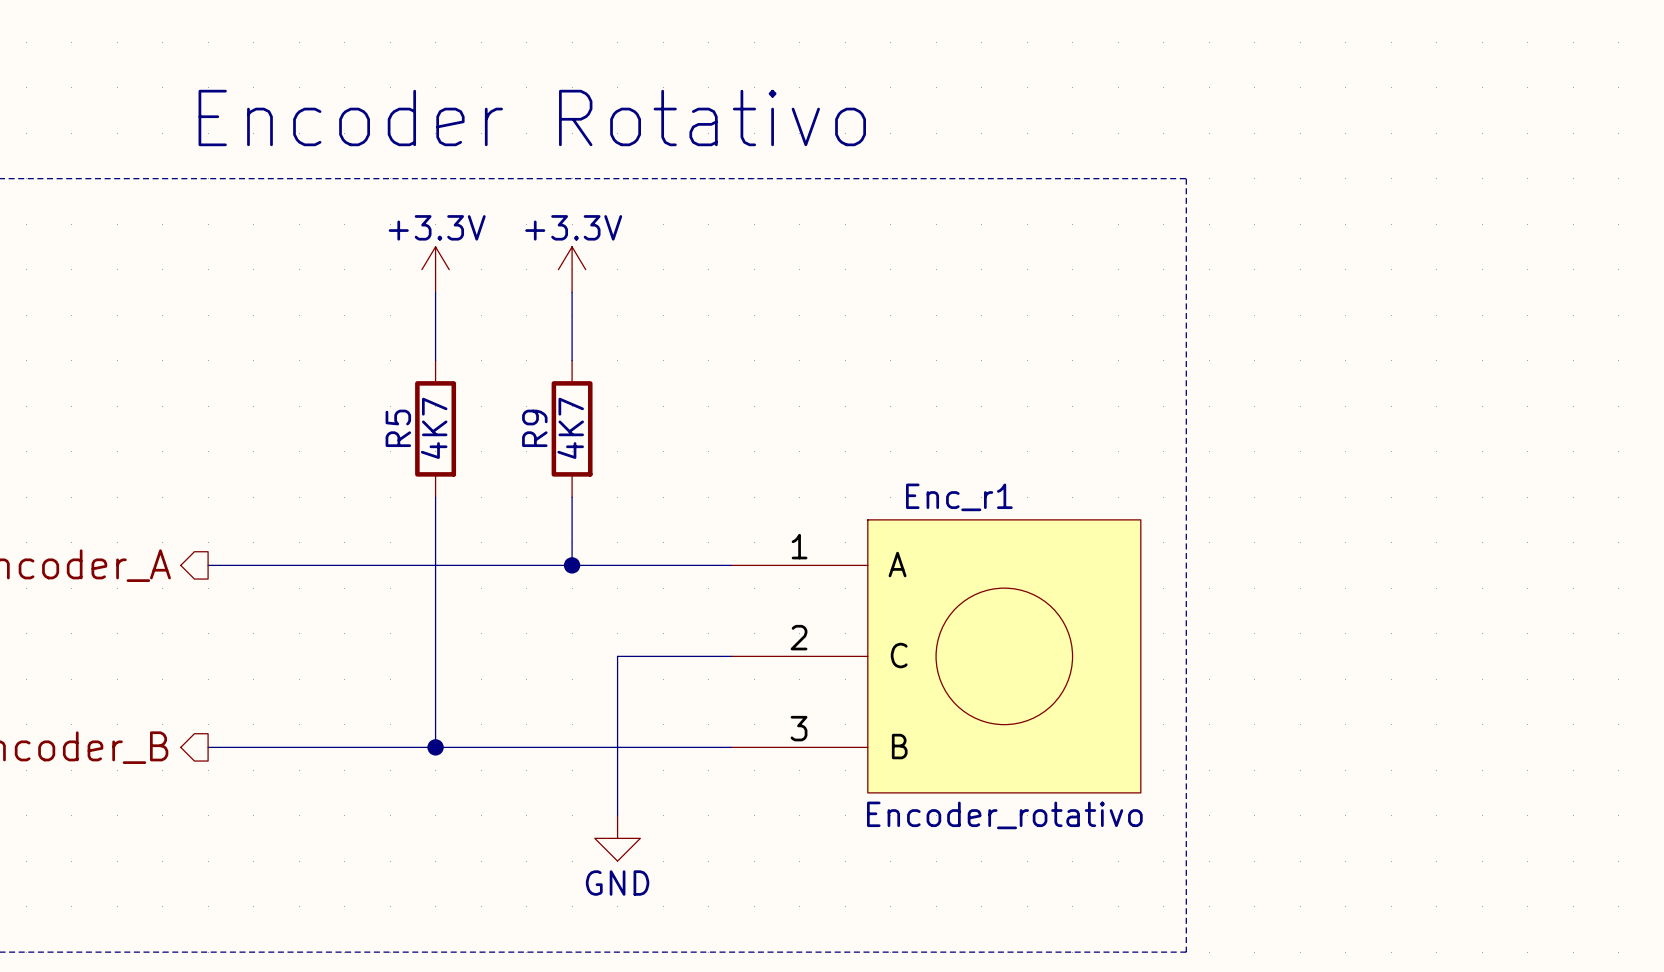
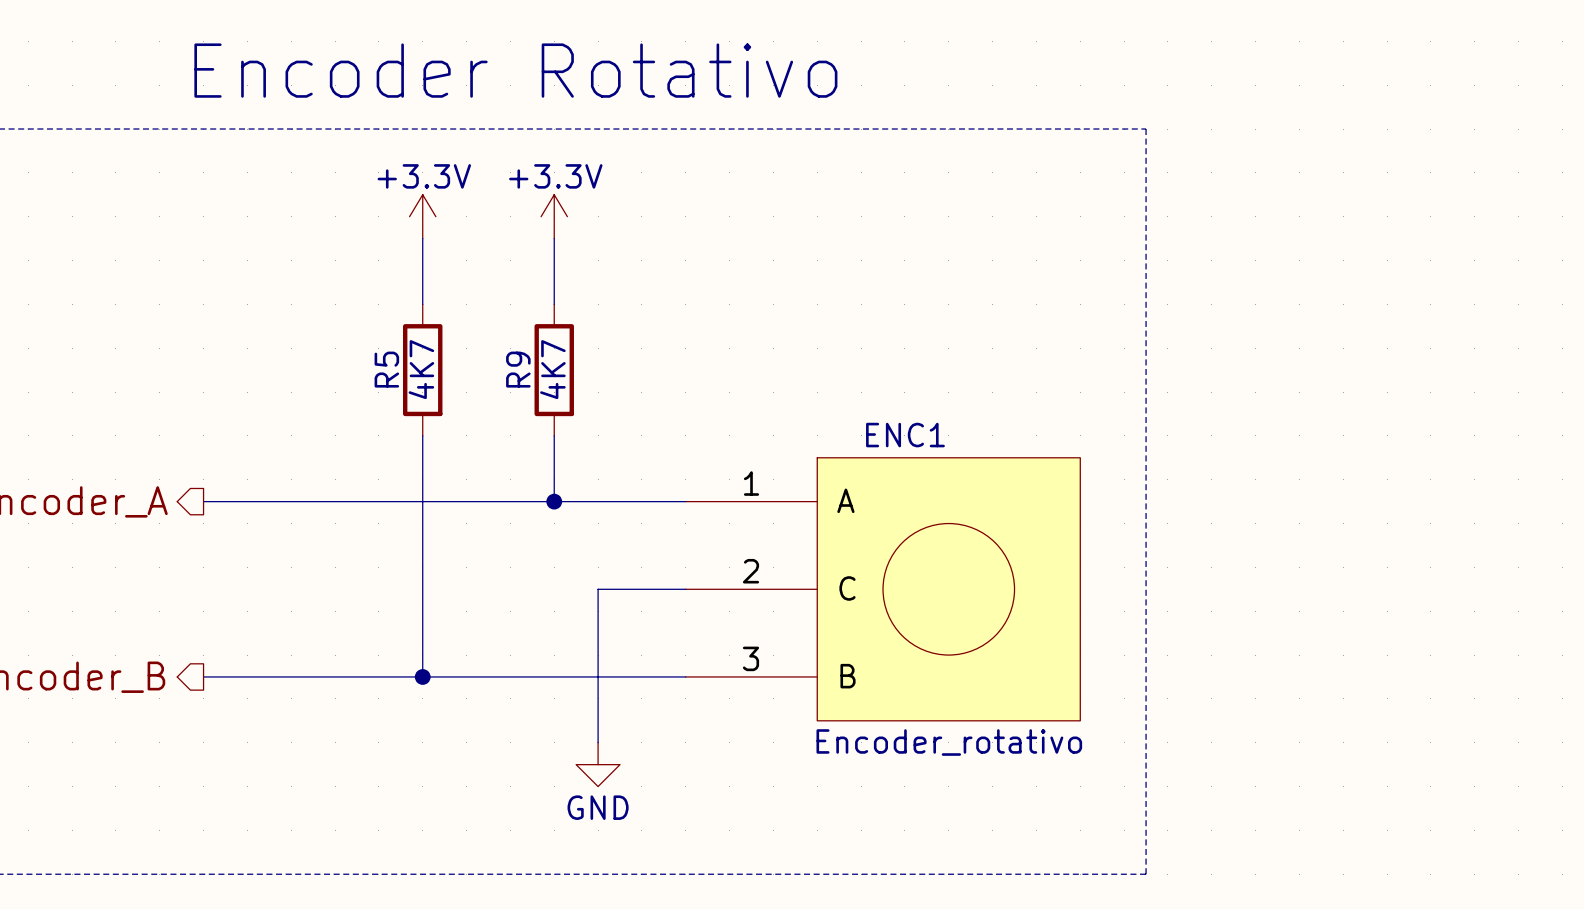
ENC1: none -> Encoder_rotativo (883, 589)
Enc_r1: Encoder_rotativo (936, 656) -> none

